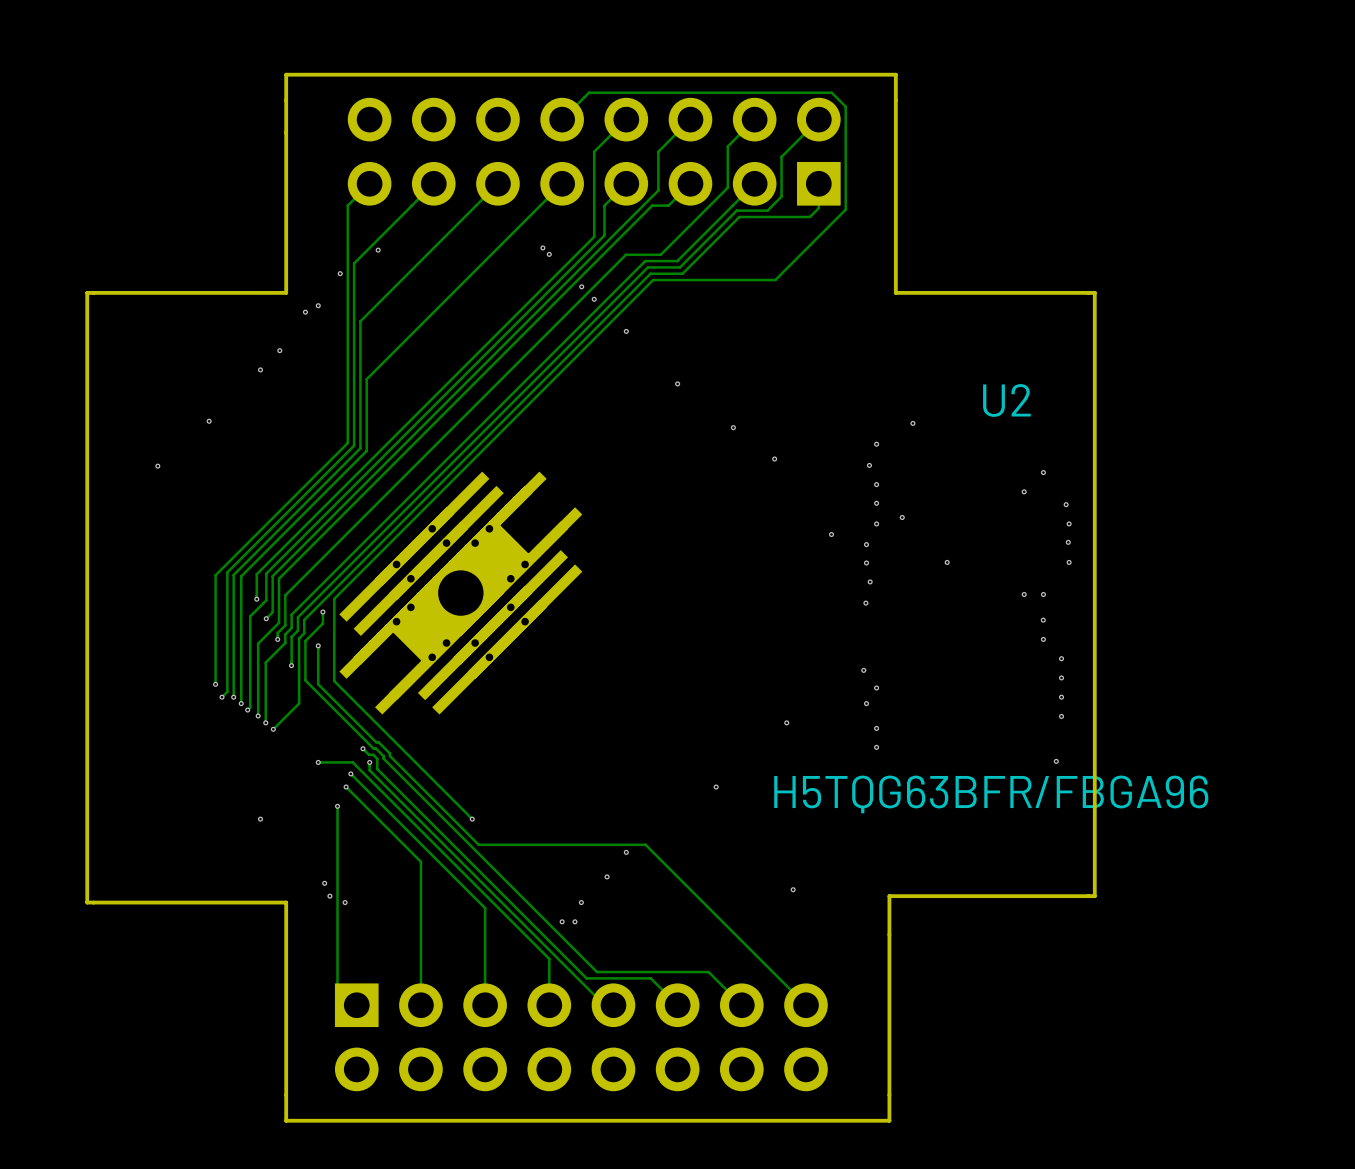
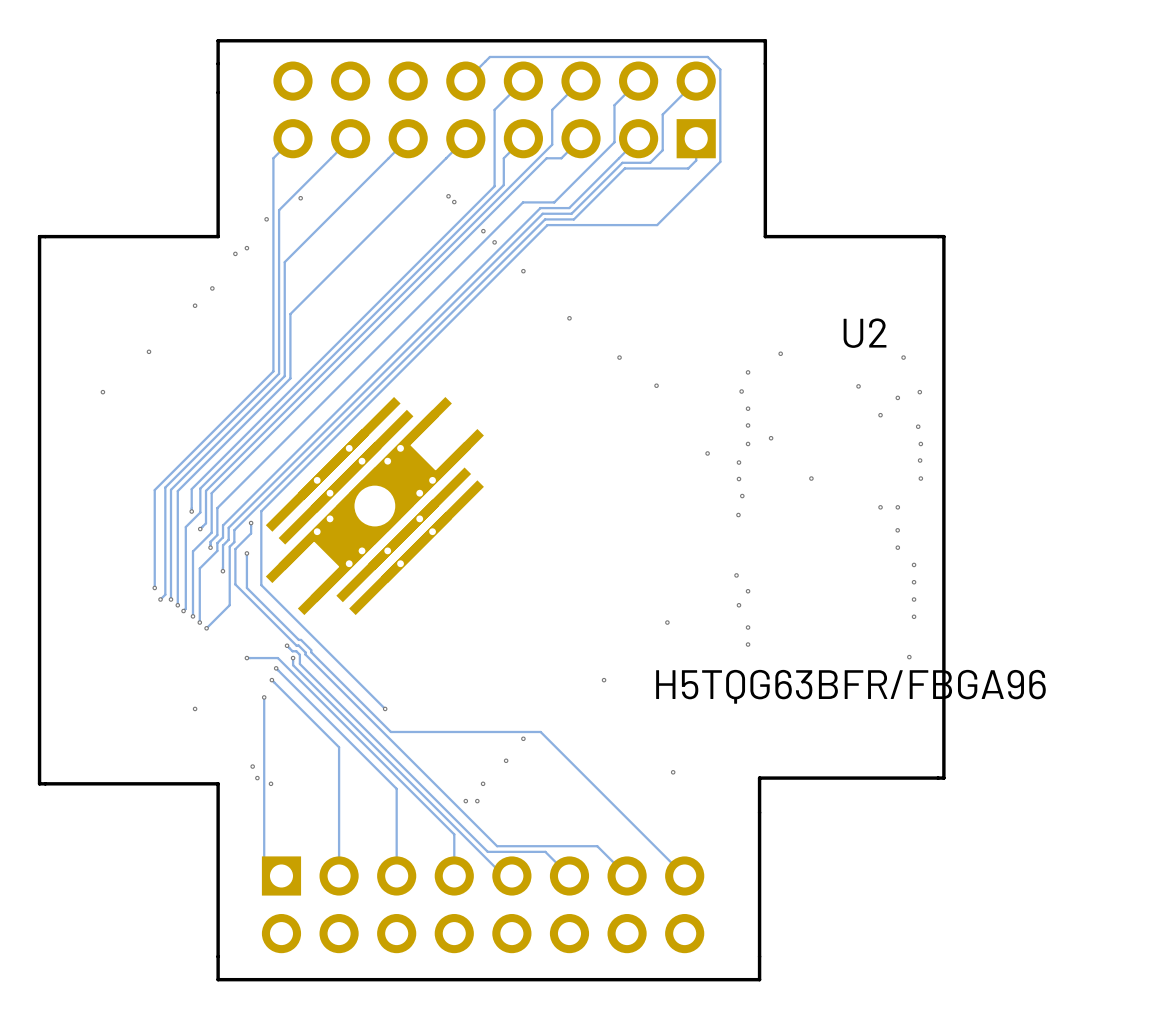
via: none -> (903, 357)
via: none -> (858, 386)
via: none -> (919, 392)

